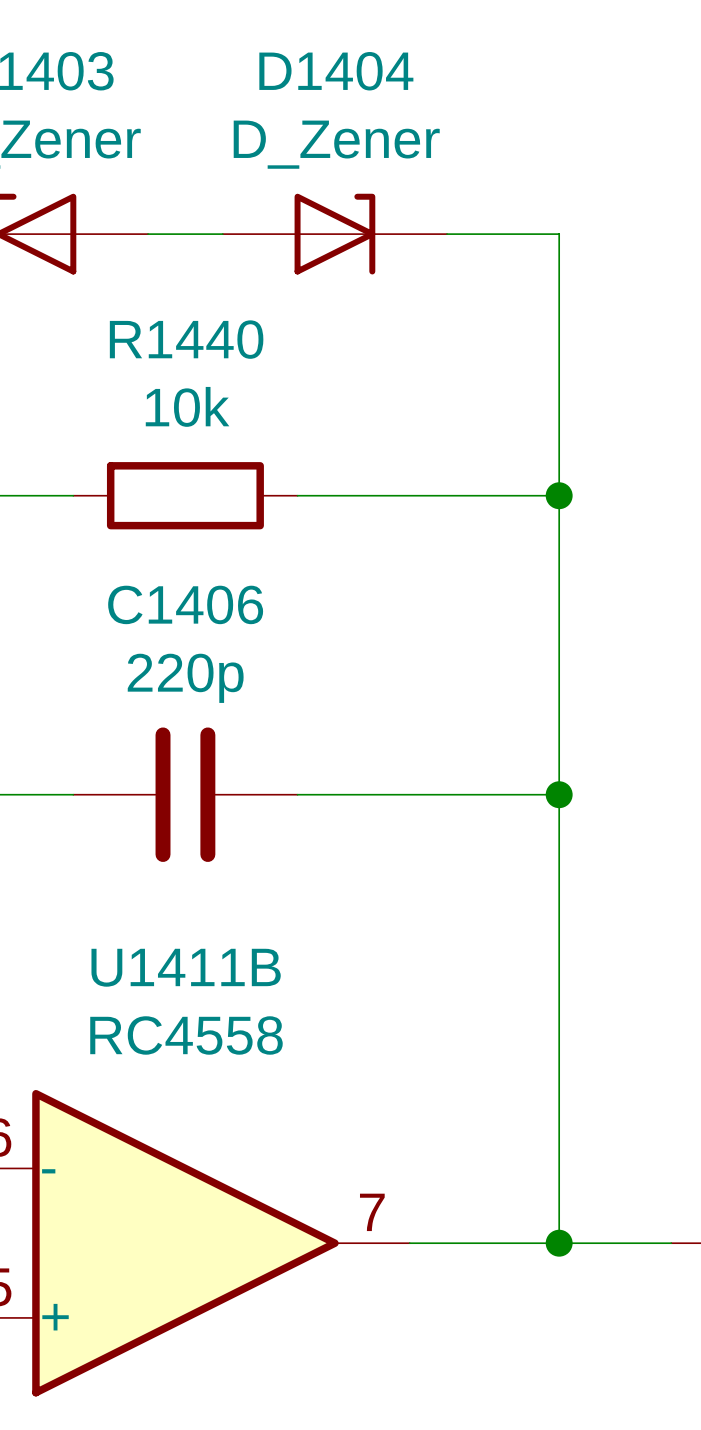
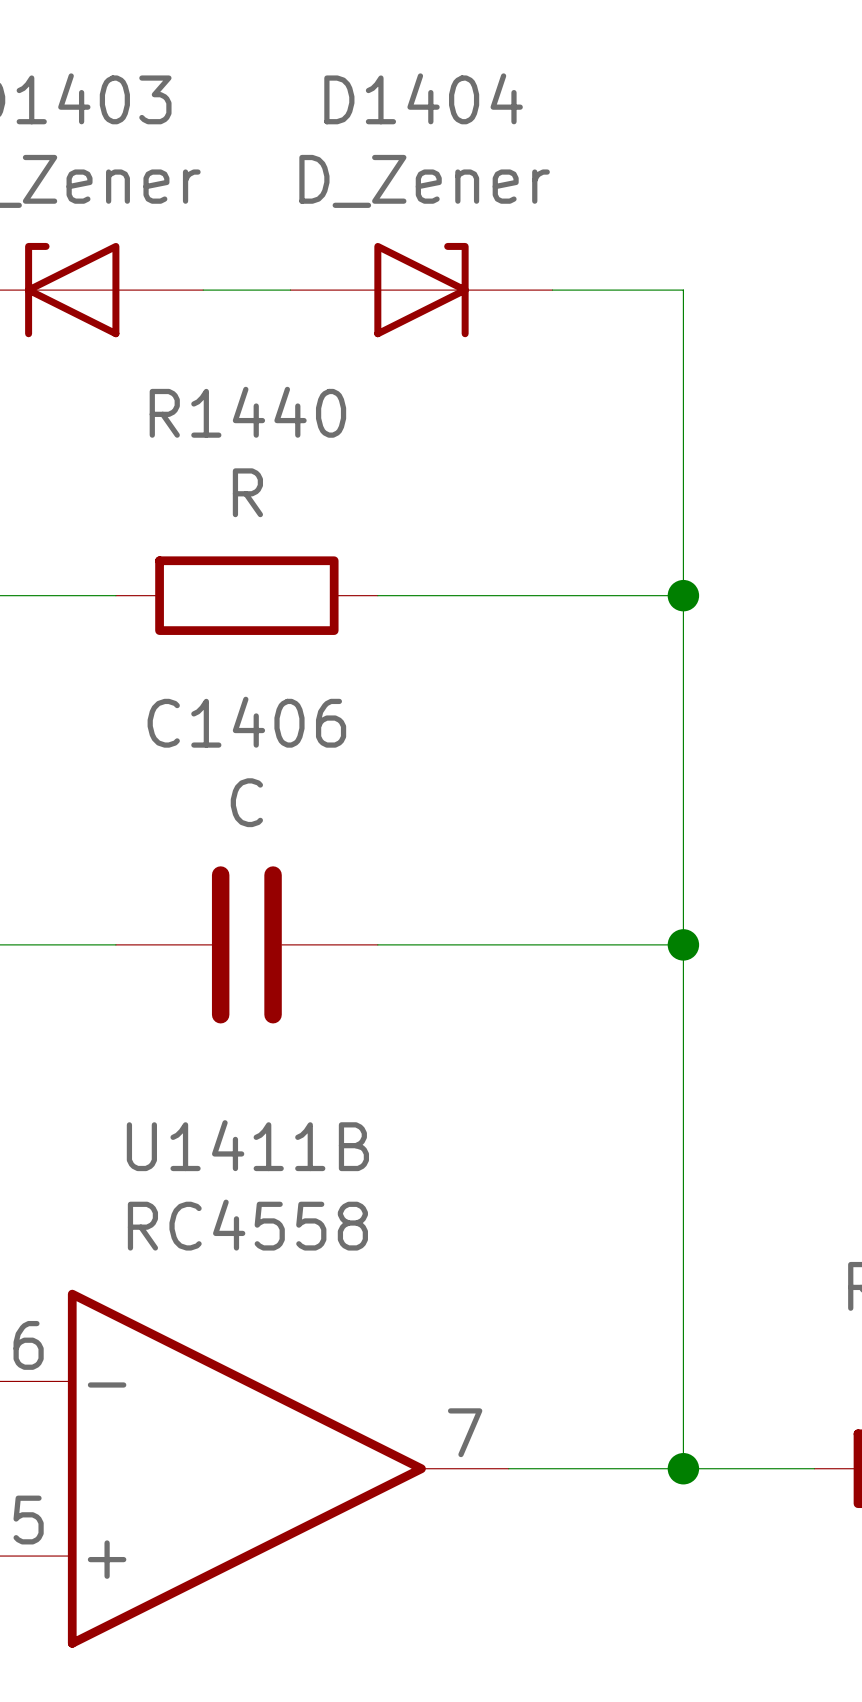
R1440 value: 10k (187, 406) -> R (247, 492)
C1406 value: 220p (185, 678) -> C (246, 802)

